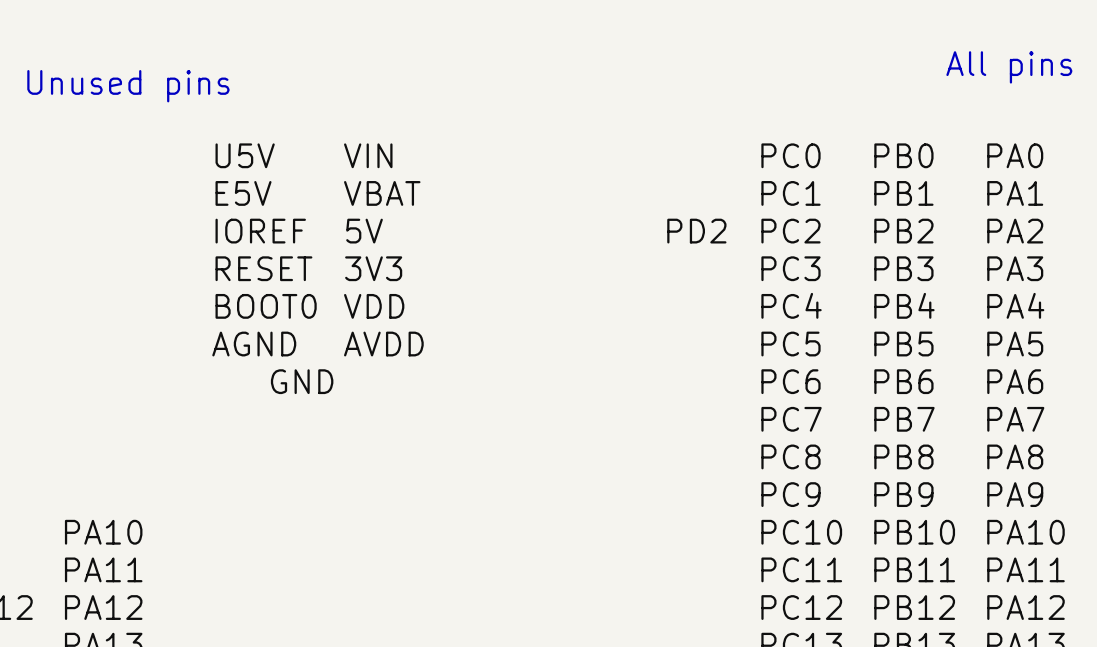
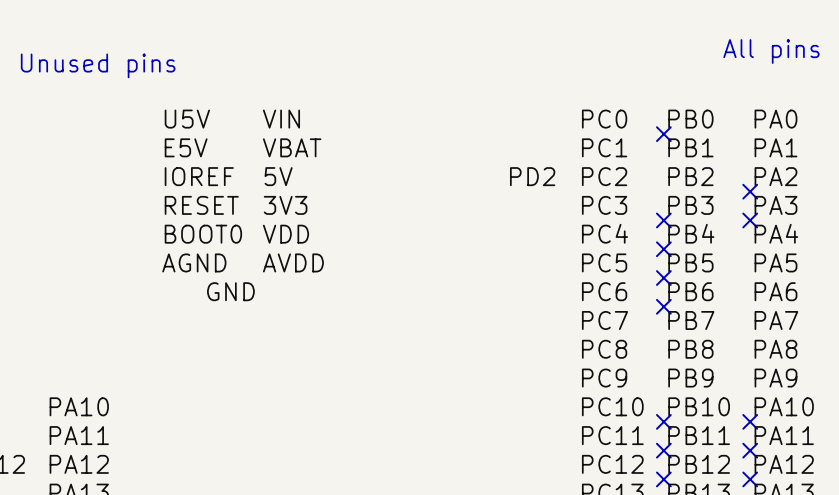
no-connect mark: none -> (663, 134)
no-connect mark: none -> (750, 191)
no-connect mark: none -> (663, 220)
no-connect mark: none -> (750, 220)
no-connect mark: none -> (663, 249)
no-connect mark: none -> (663, 278)
no-connect mark: none -> (663, 306)
no-connect mark: none -> (663, 421)
no-connect mark: none -> (750, 421)
no-connect mark: none -> (663, 450)
no-connect mark: none -> (750, 450)
no-connect mark: none -> (663, 479)
no-connect mark: none -> (750, 479)

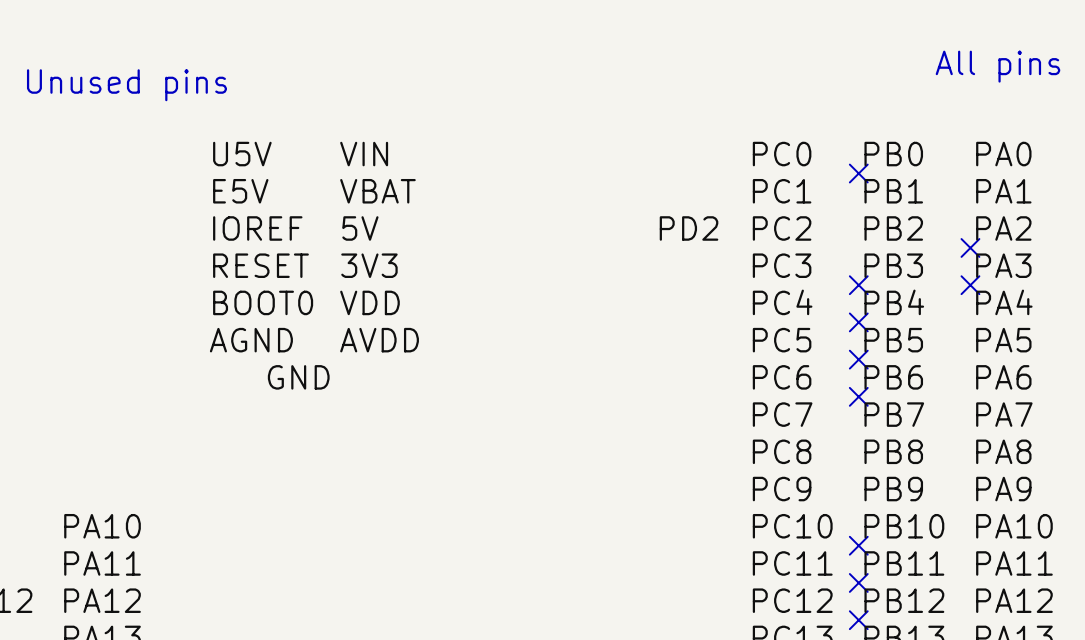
no-connect mark: (750, 421) -> none
no-connect mark: (750, 450) -> none
no-connect mark: (750, 479) -> none

